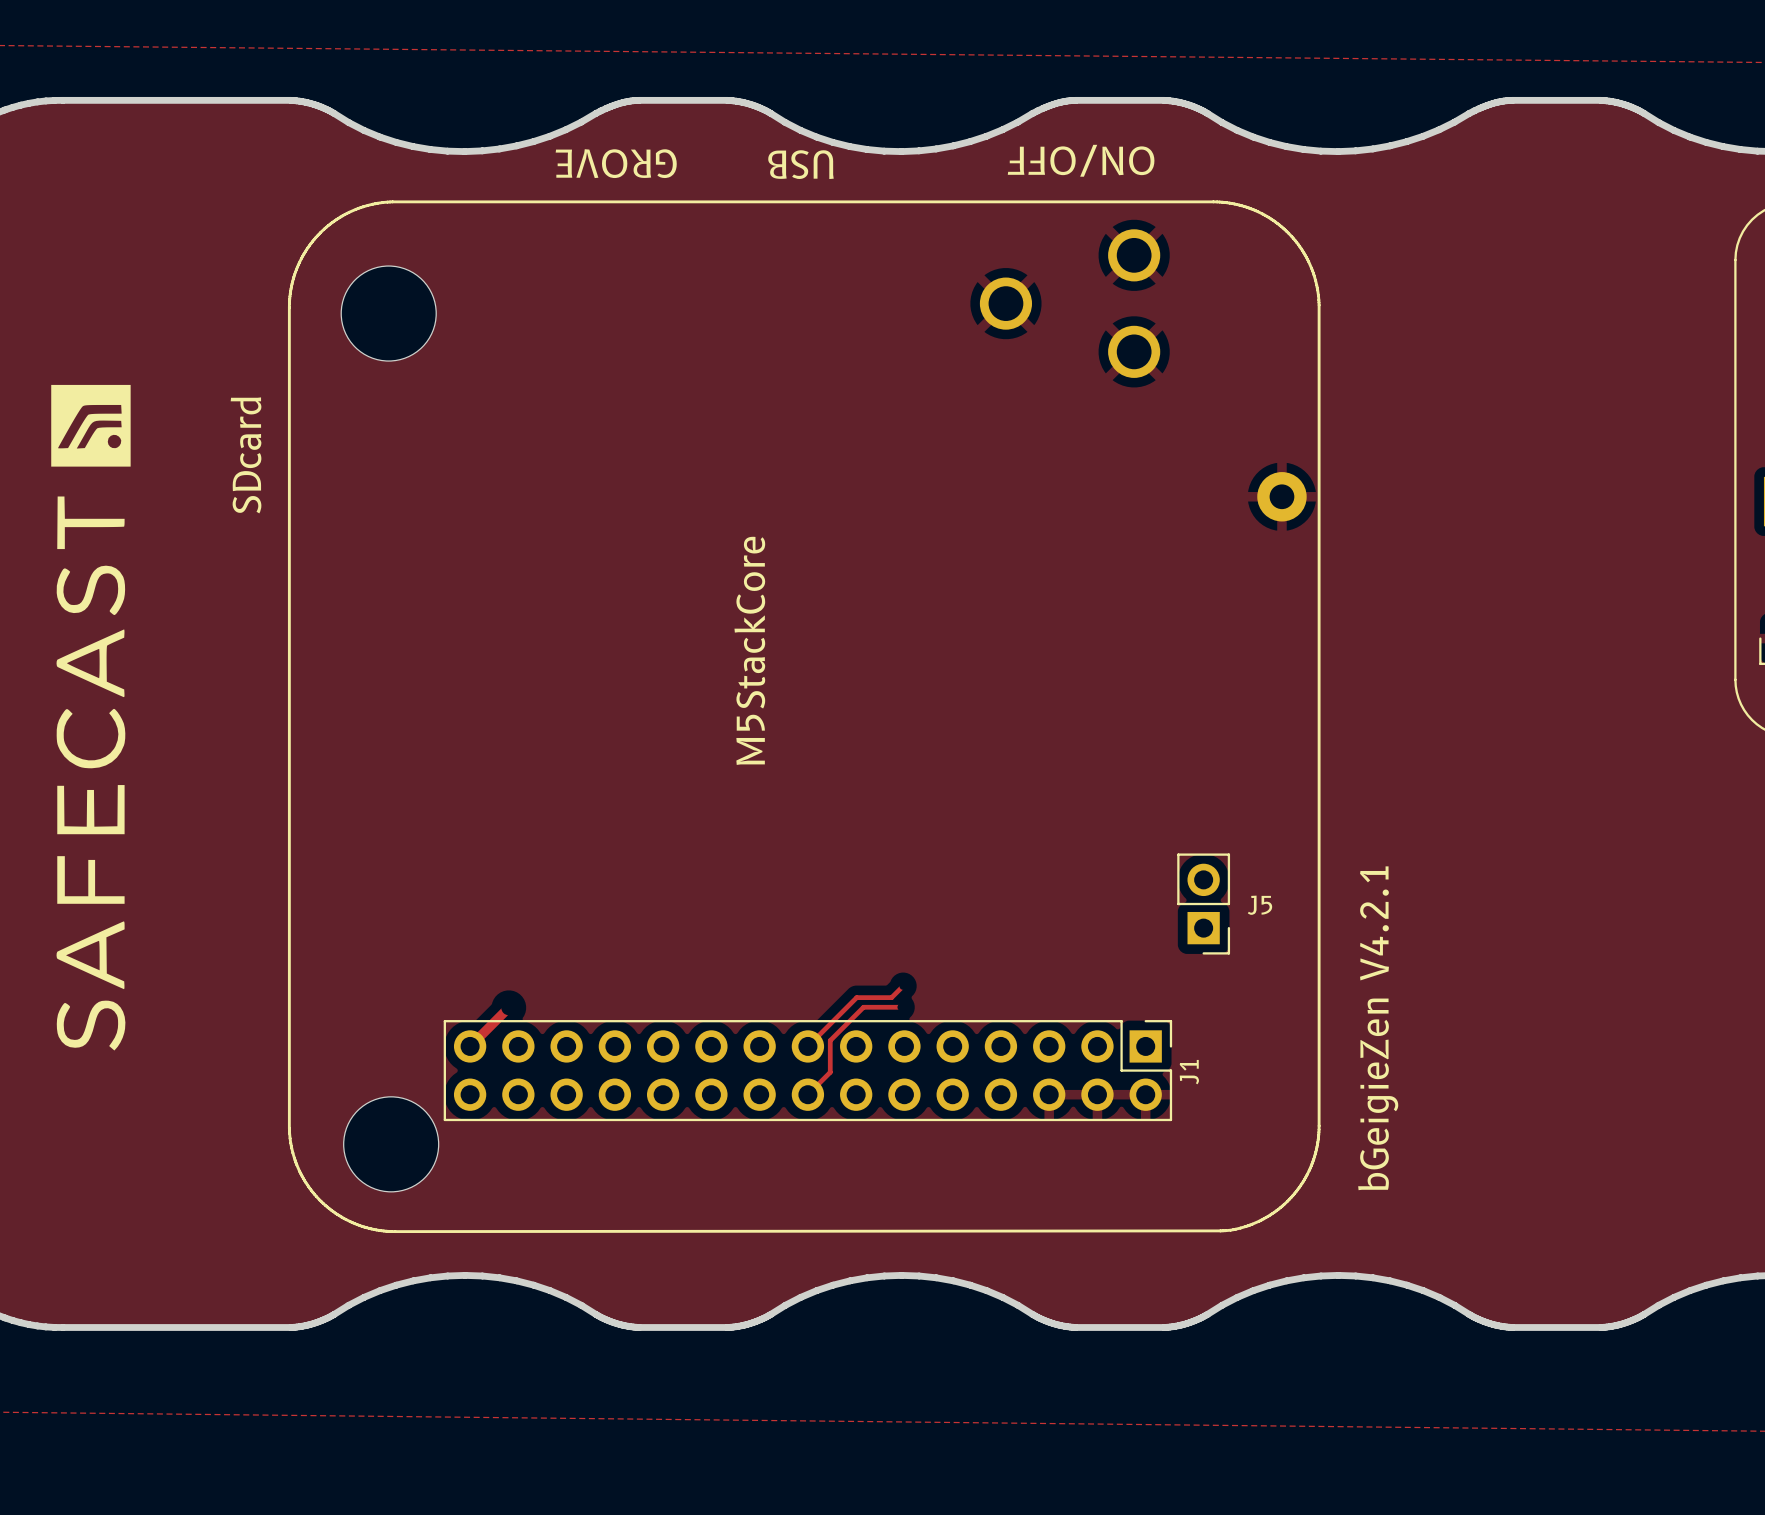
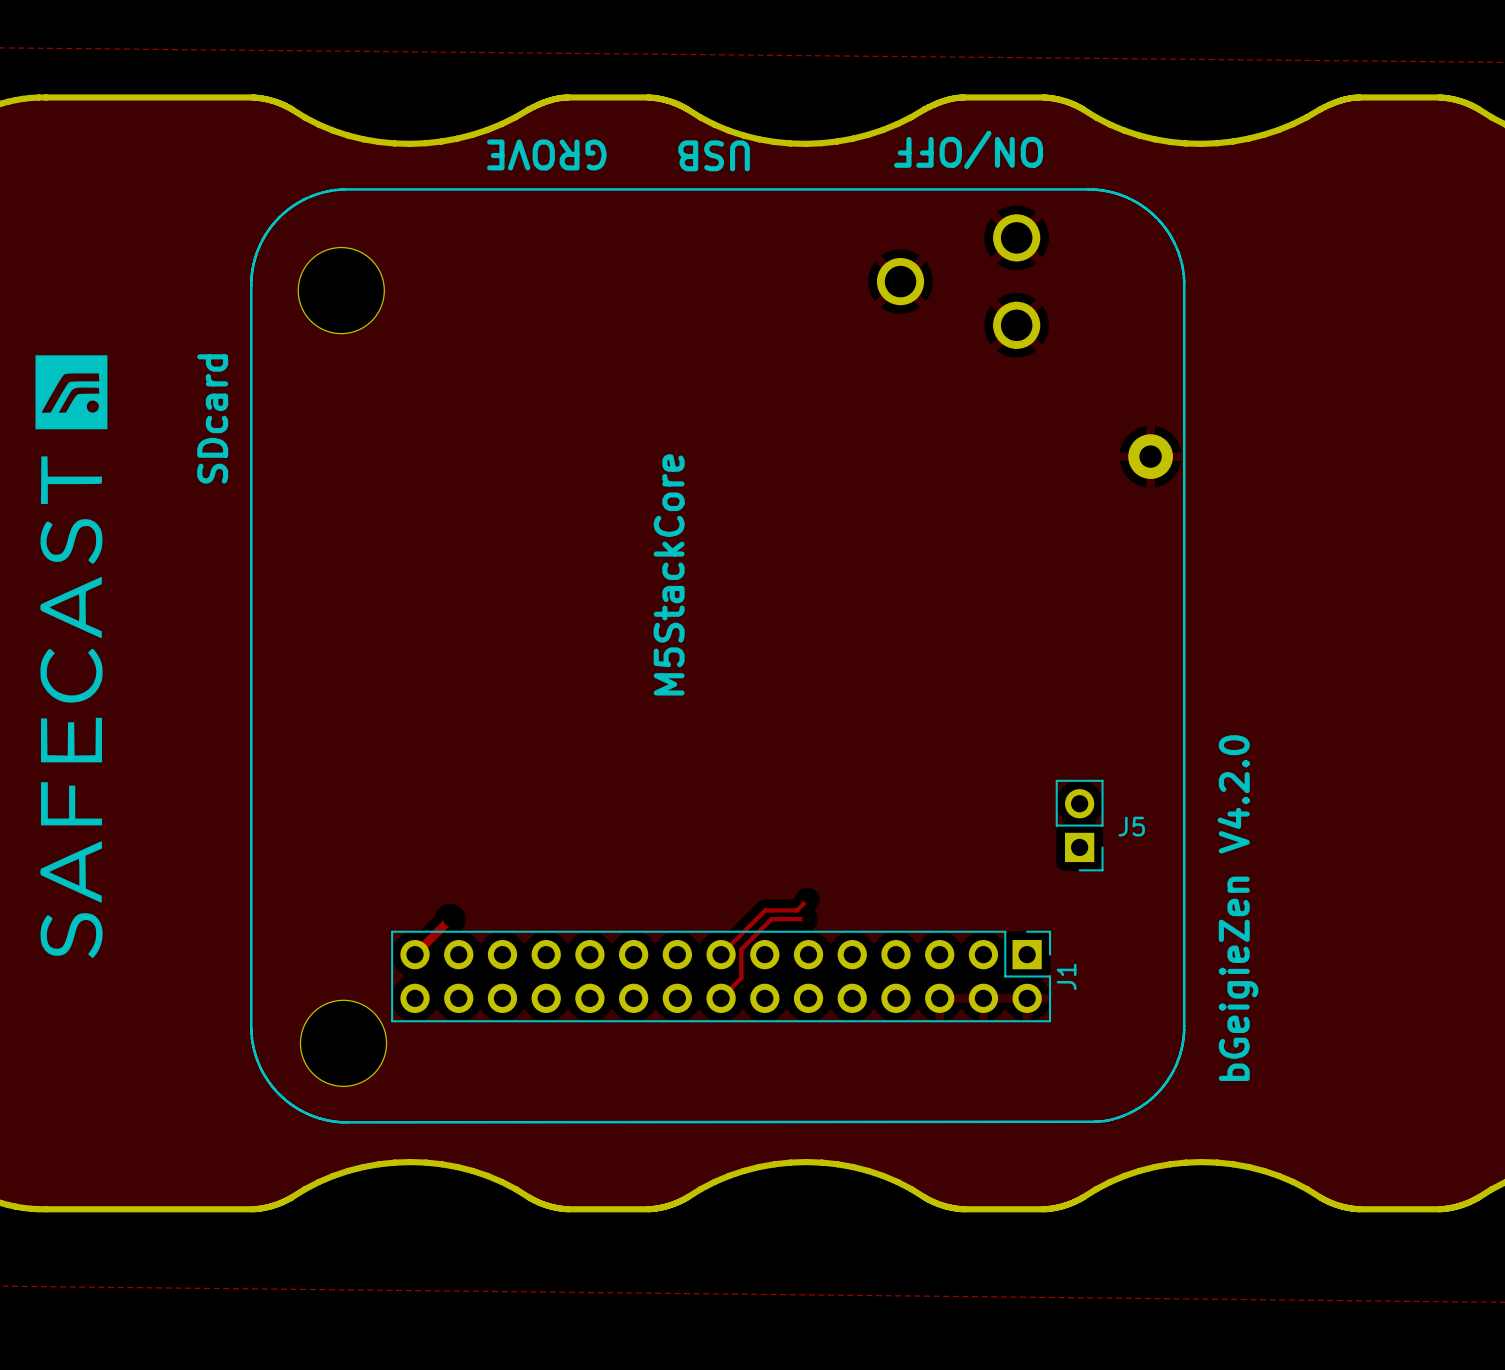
text: bGeigieZen V4.2.1 (1378, 1028) -> bGeigieZen V4.2.0 (1237, 908)

